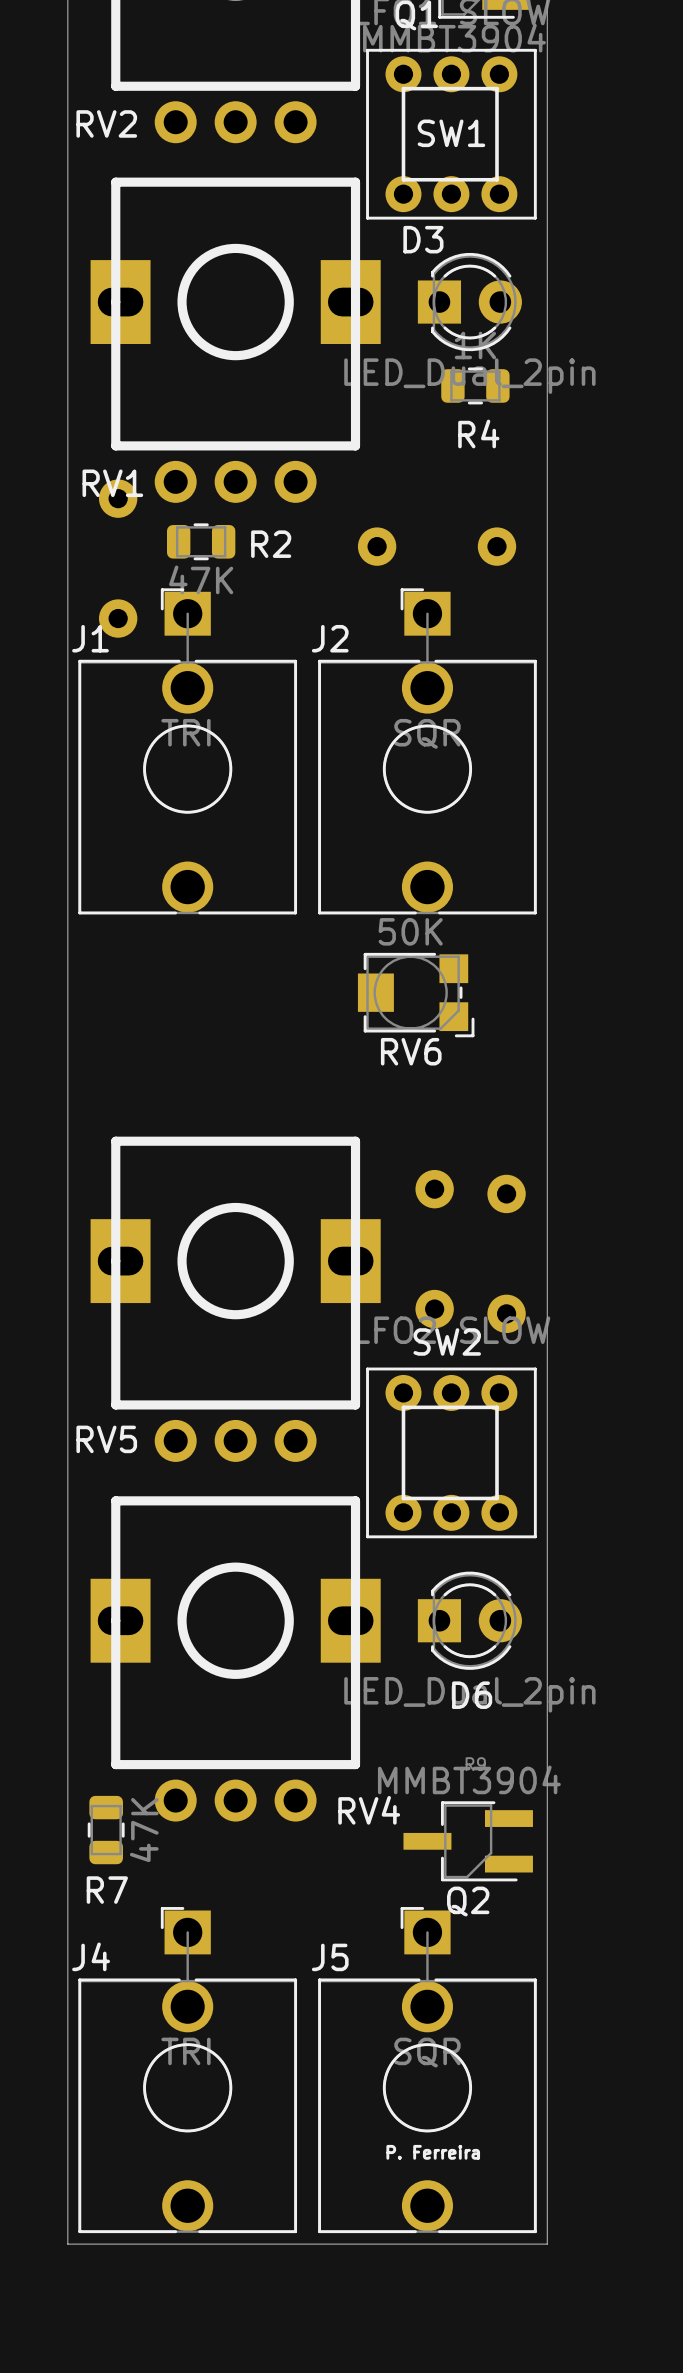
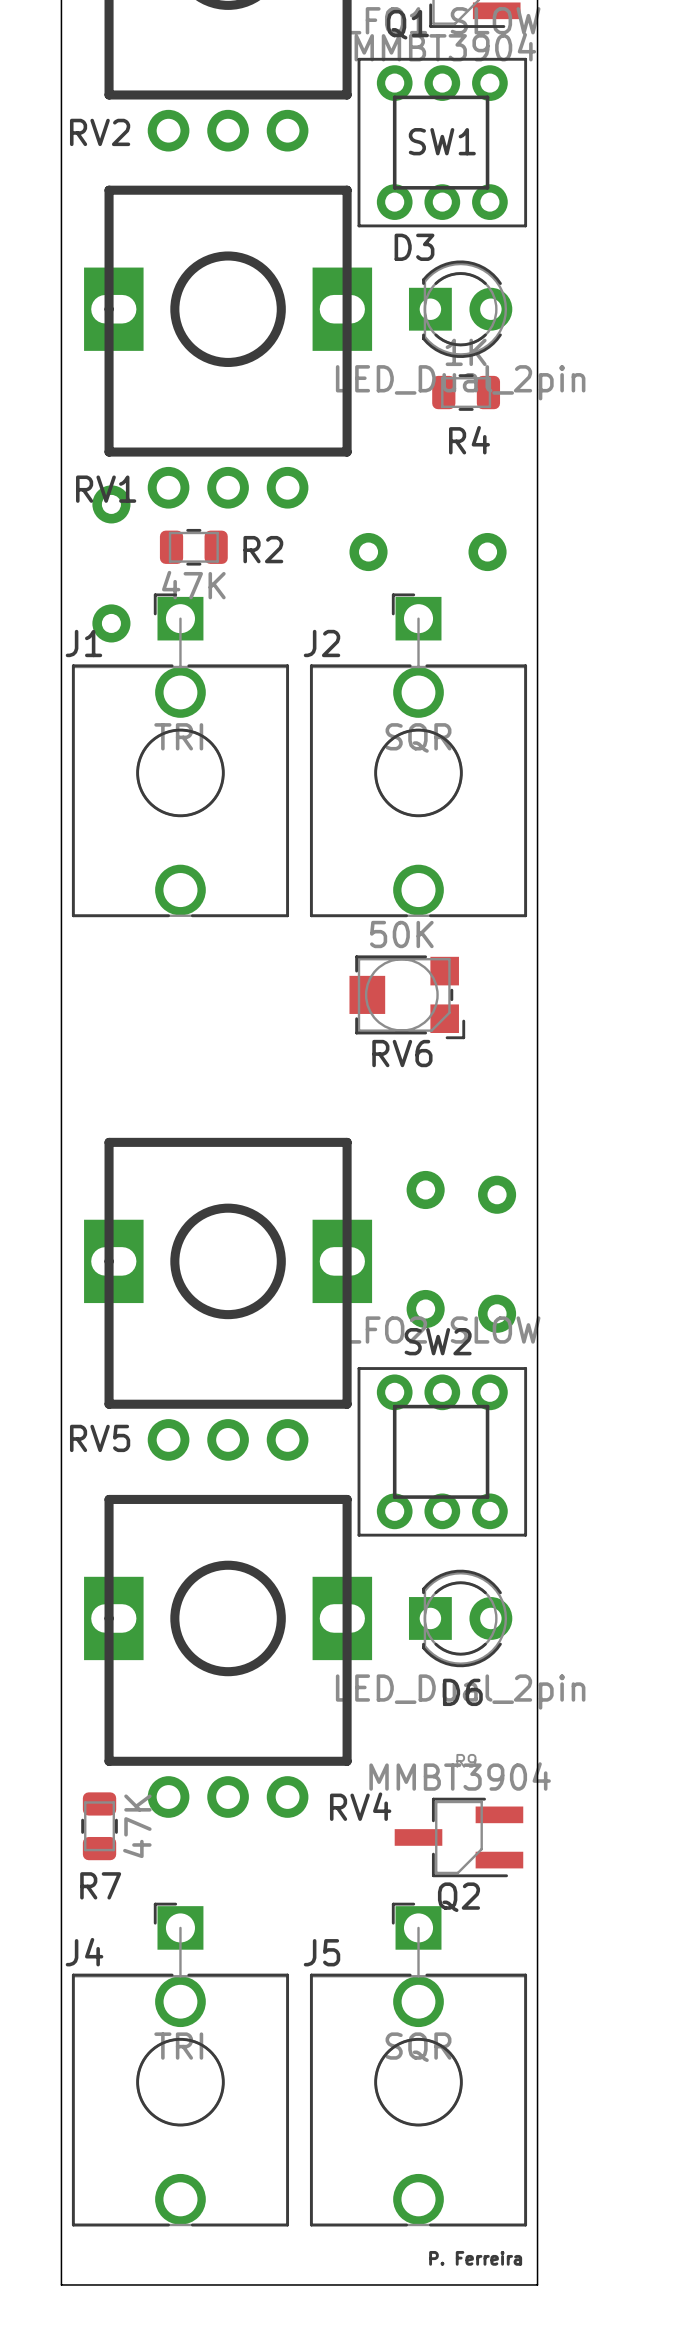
text position: P. Ferreira (433, 2152) -> P. Ferreira (475, 2258)
board edge: (67, 2244) (547, 2244) -> (61, 2237) (61, 2284) (537, 2284) (537, 2237)

